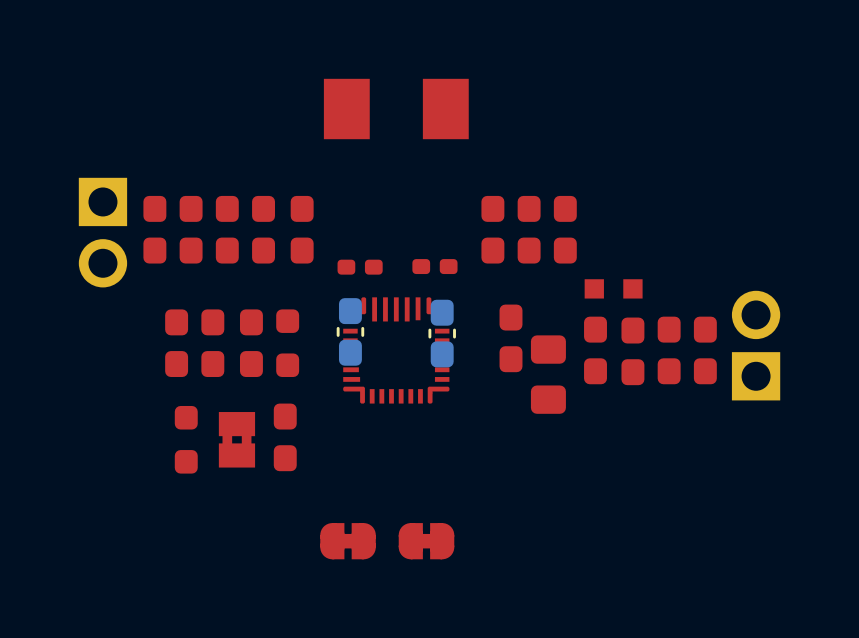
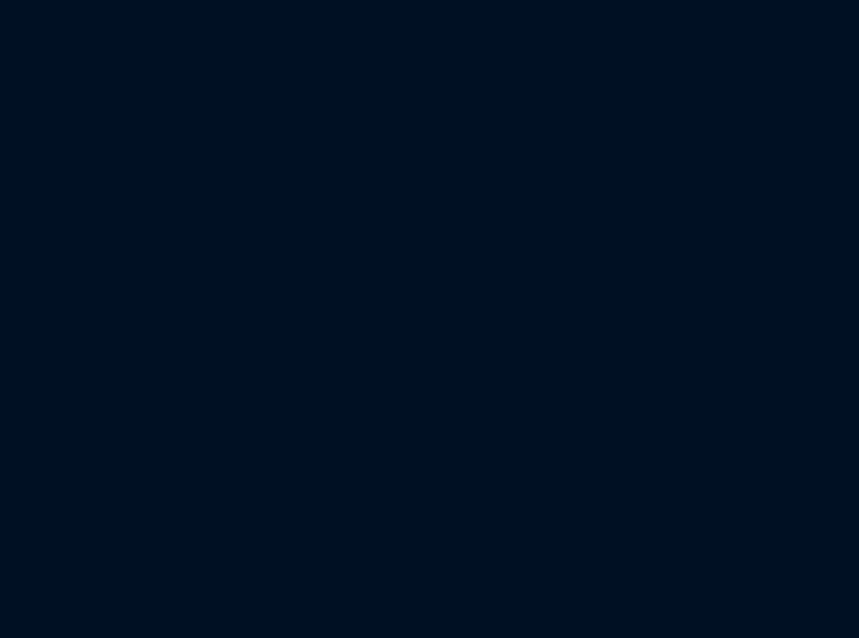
part: (396, 109) -> none
part: (154, 229) -> none
part: (191, 229) -> none
part: (227, 229) -> none
part: (263, 229) -> none
part: (302, 229) -> none
part: (492, 229) -> none
part: (529, 229) -> none
part: (565, 229) -> none
part: (102, 232) -> none
part: (434, 266) -> none
part: (360, 267) -> none
part: (613, 288) -> none
part: (350, 331) -> none
part: (442, 333) -> none
part: (511, 338) -> none
part: (176, 343) -> none
part: (212, 343) -> none
part: (251, 343) -> none
part: (287, 343) -> none
part: (756, 345) -> none
part: (396, 350) -> none
part: (595, 350) -> none
part: (669, 350) -> none
part: (705, 350) -> none
part: (632, 351) -> none
part: (548, 374) -> none
part: (285, 437) -> none
part: (186, 439) -> none
part: (236, 439) -> none
part: (348, 541) -> none
part: (426, 541) -> none

